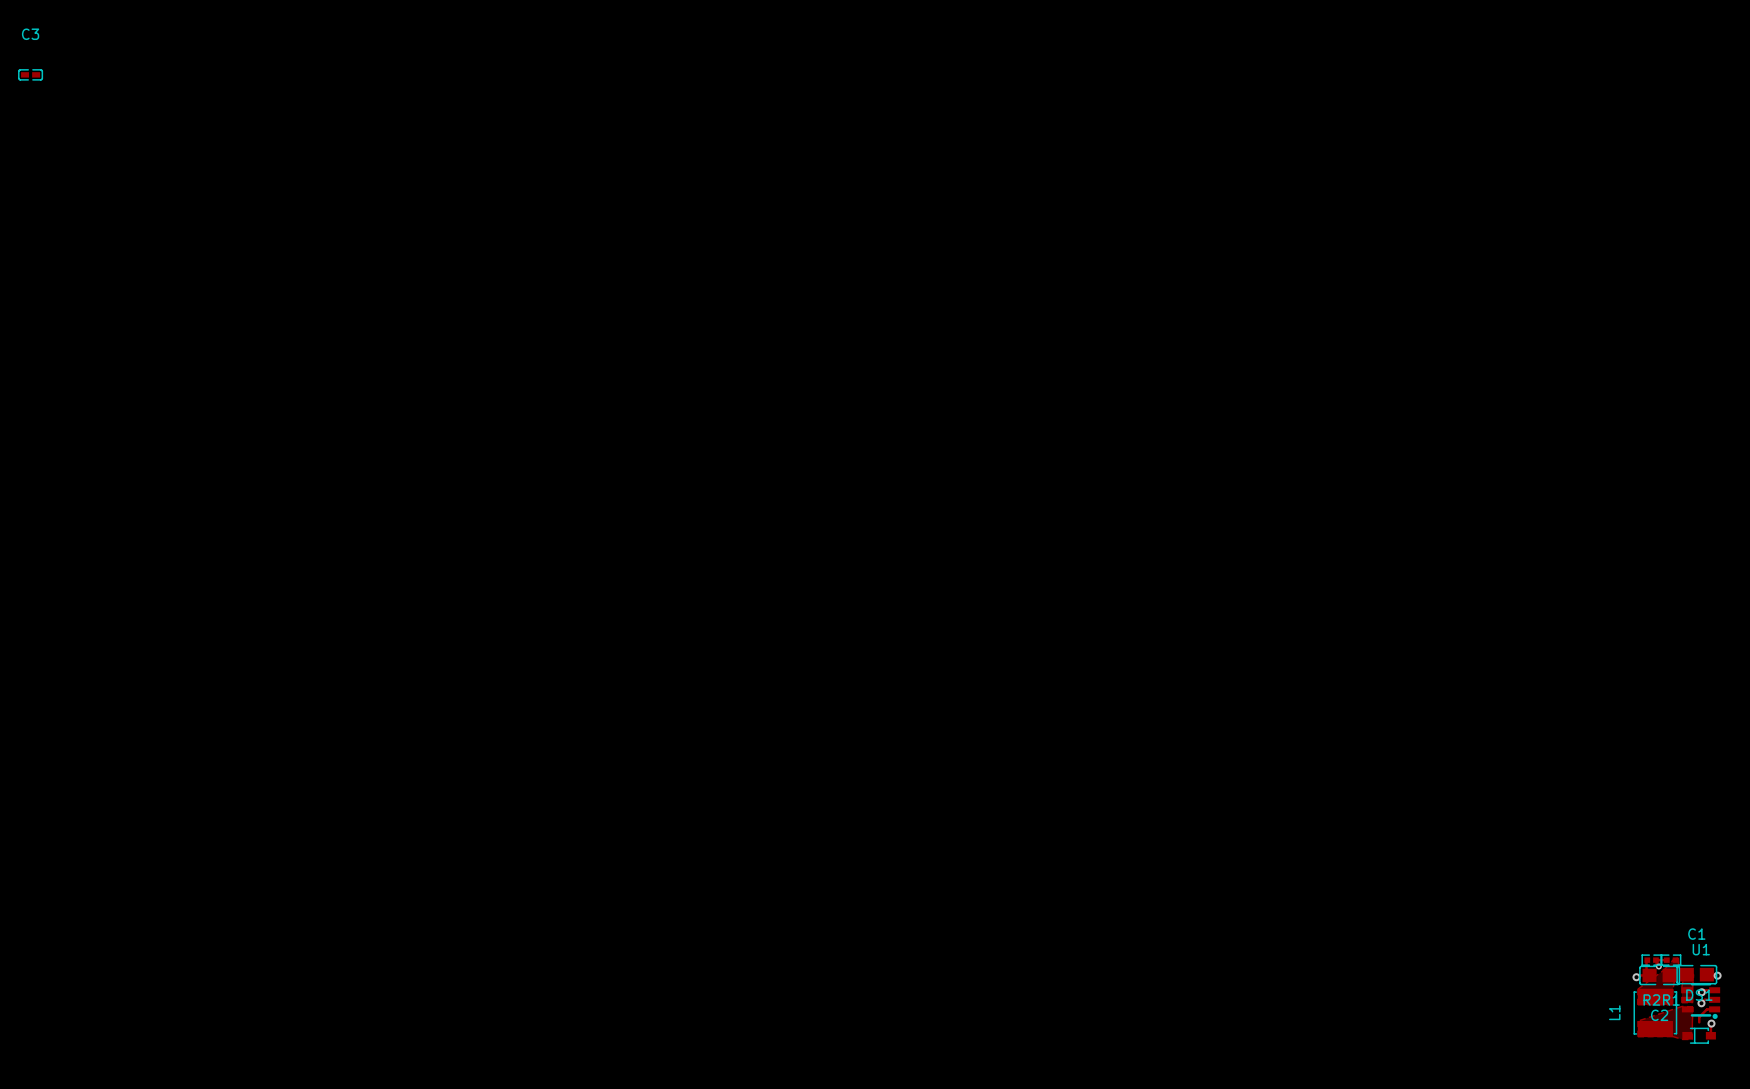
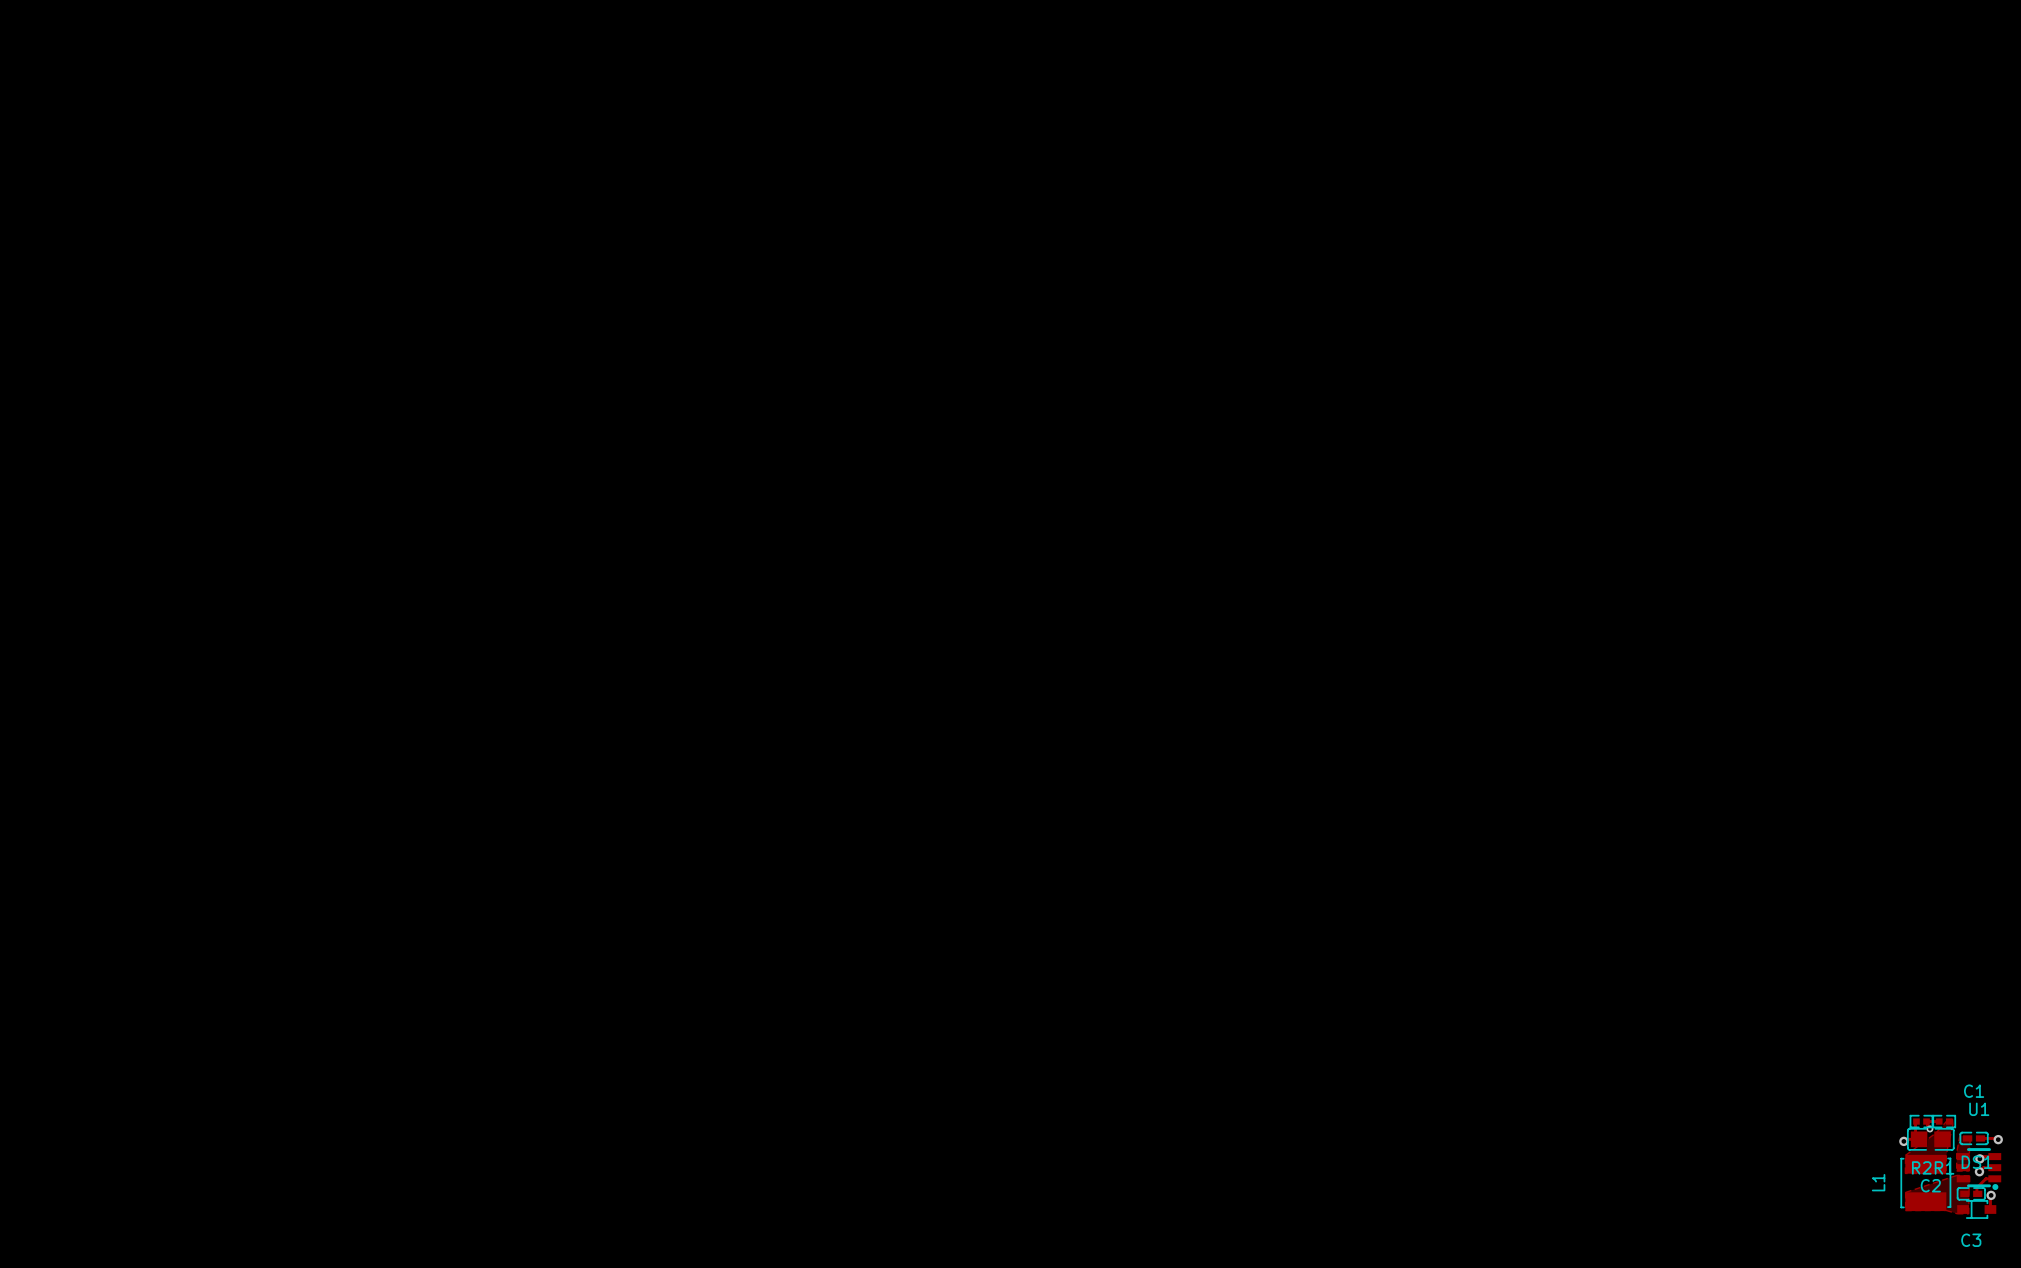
C3 name position: C3 (30, 34) -> C3 (1971, 1240)
C3 position: (30, 74) -> (1971, 1193)
C1 footprint: [1676, 964, 1718, 985] -> [1959, 1131, 1989, 1146]

